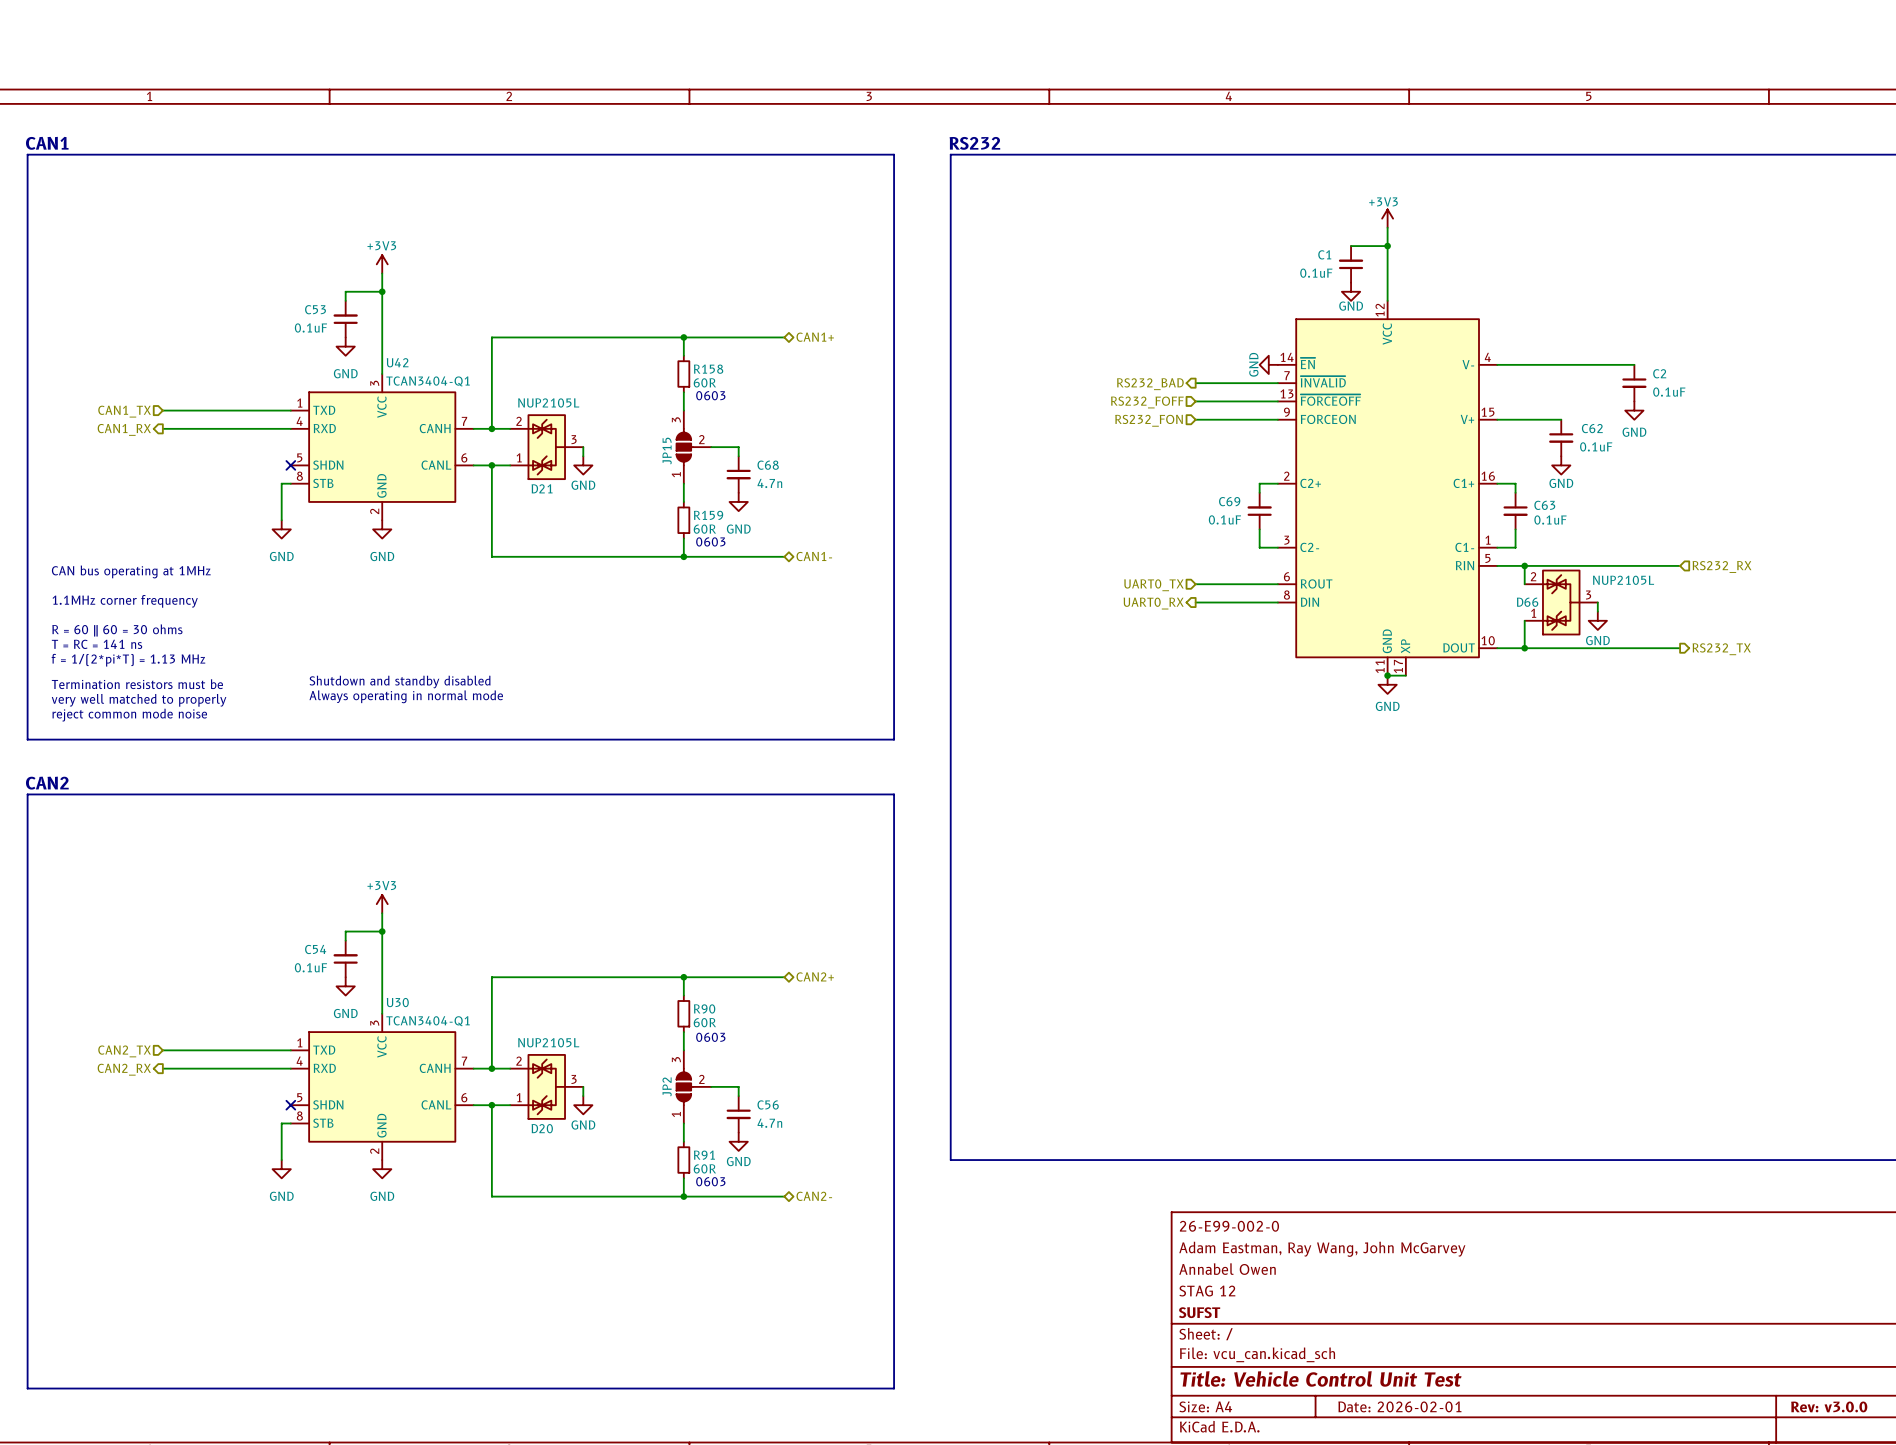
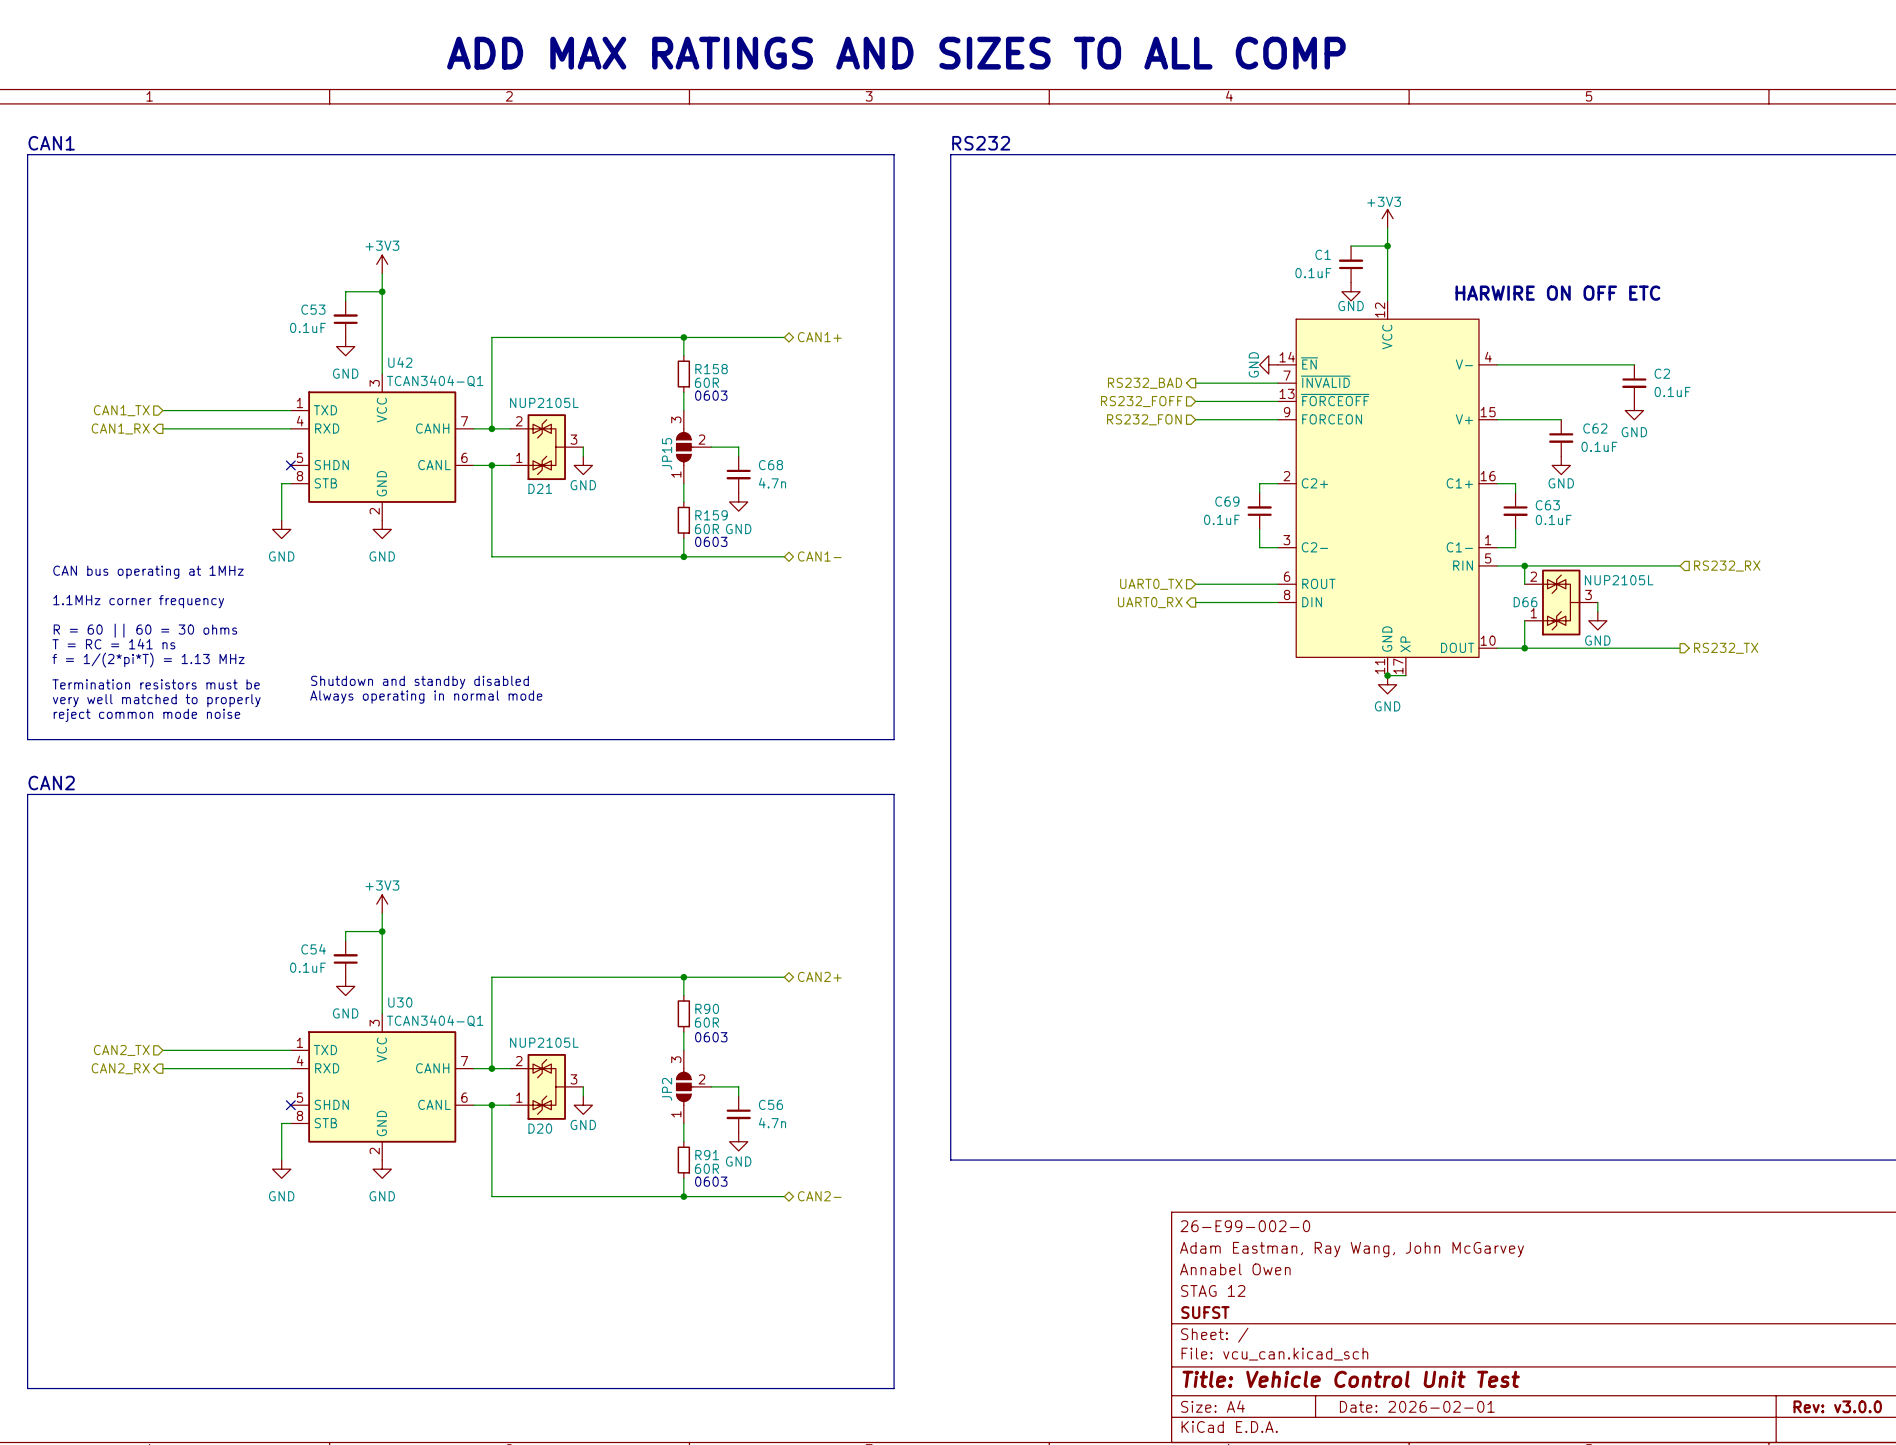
text: none -> ADD MAX RATINGS AND SIZES TO ALL COMP (896, 53)
text: none -> HARWIRE ON OFF ETC (1557, 293)

